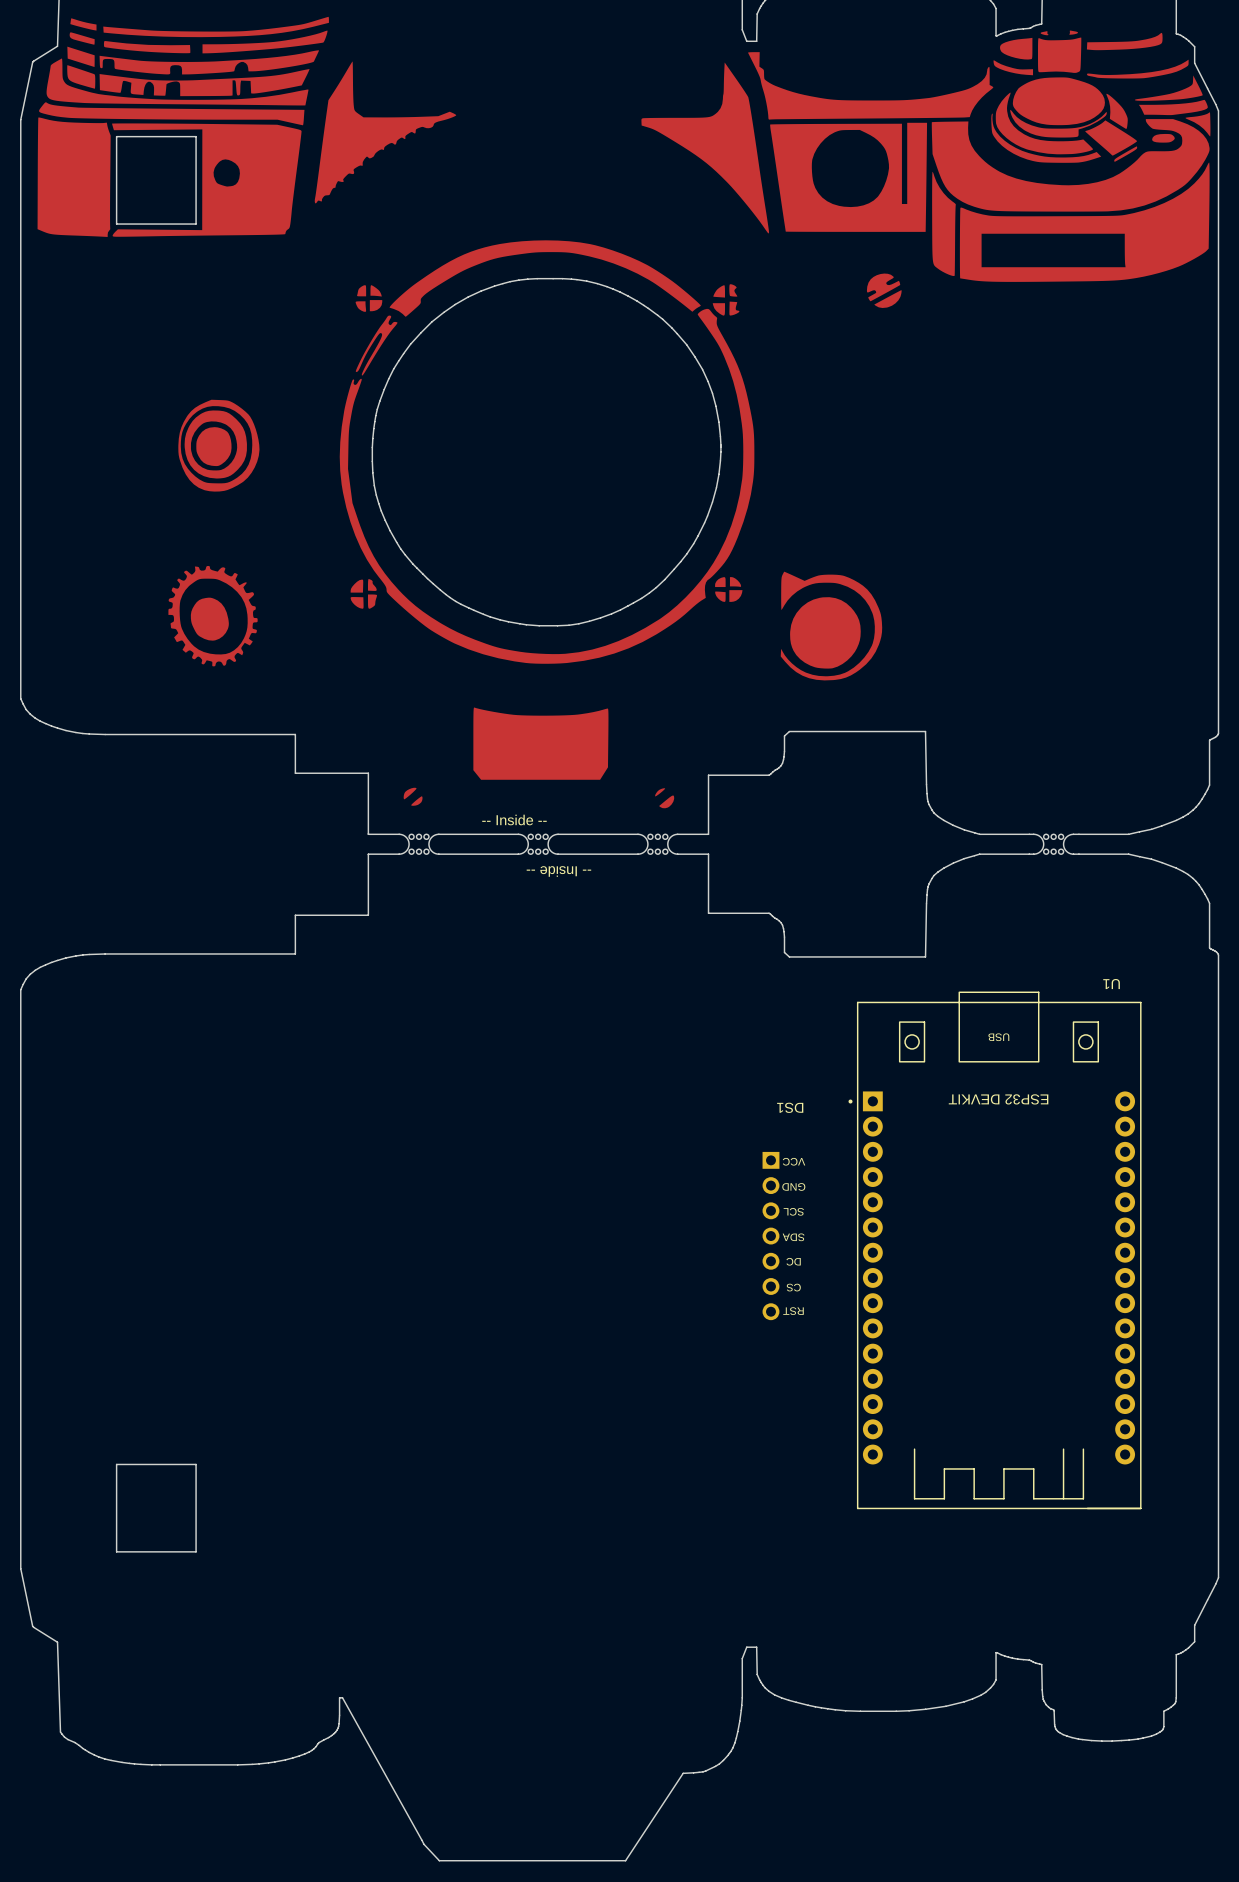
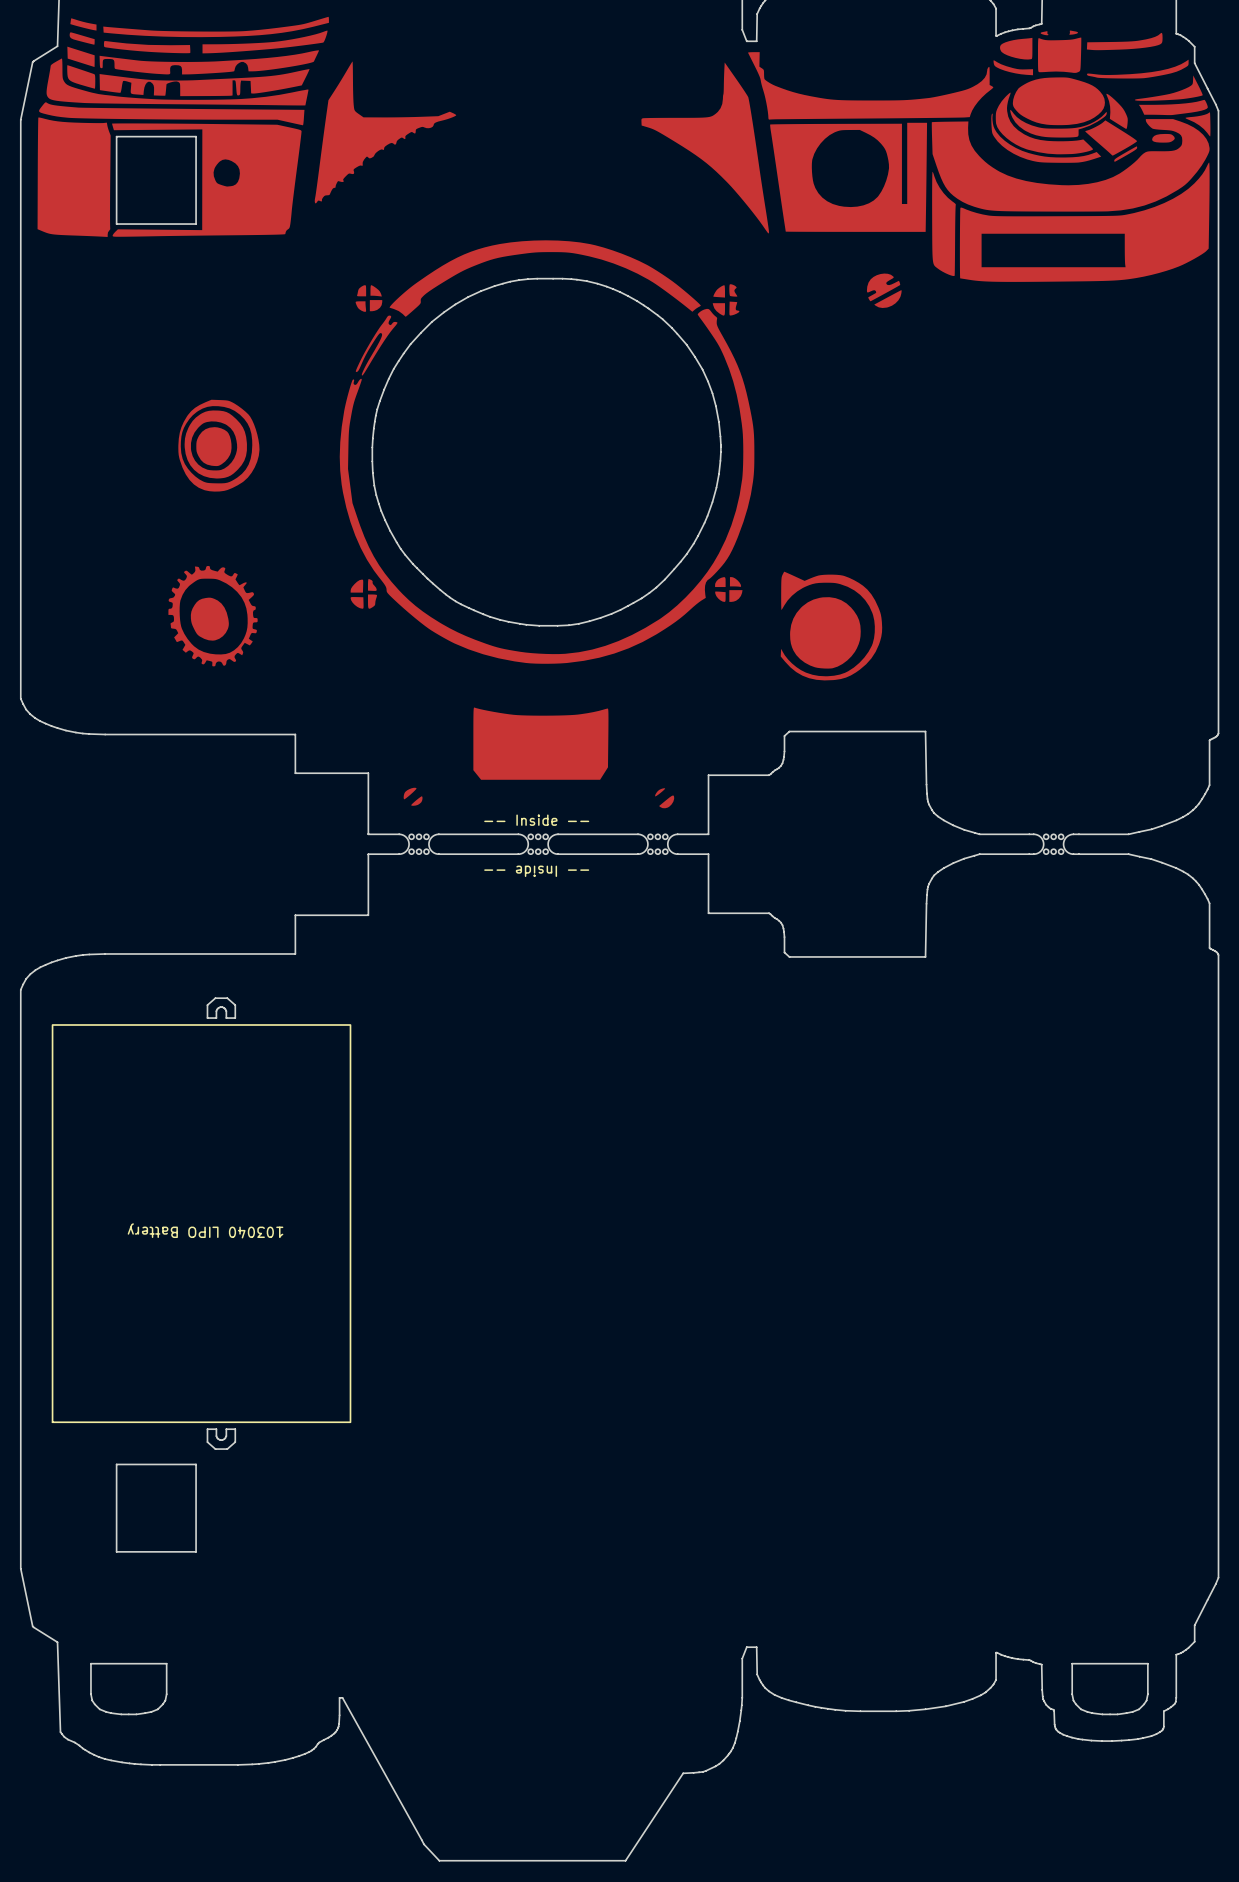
drawing: none -> [51, 997, 352, 1450]
DS1: (770, 1236) -> none
U1: (994, 1250) -> none
drawing: none -> [90, 1663, 167, 1715]
drawing: none -> [1071, 1663, 1149, 1715]

